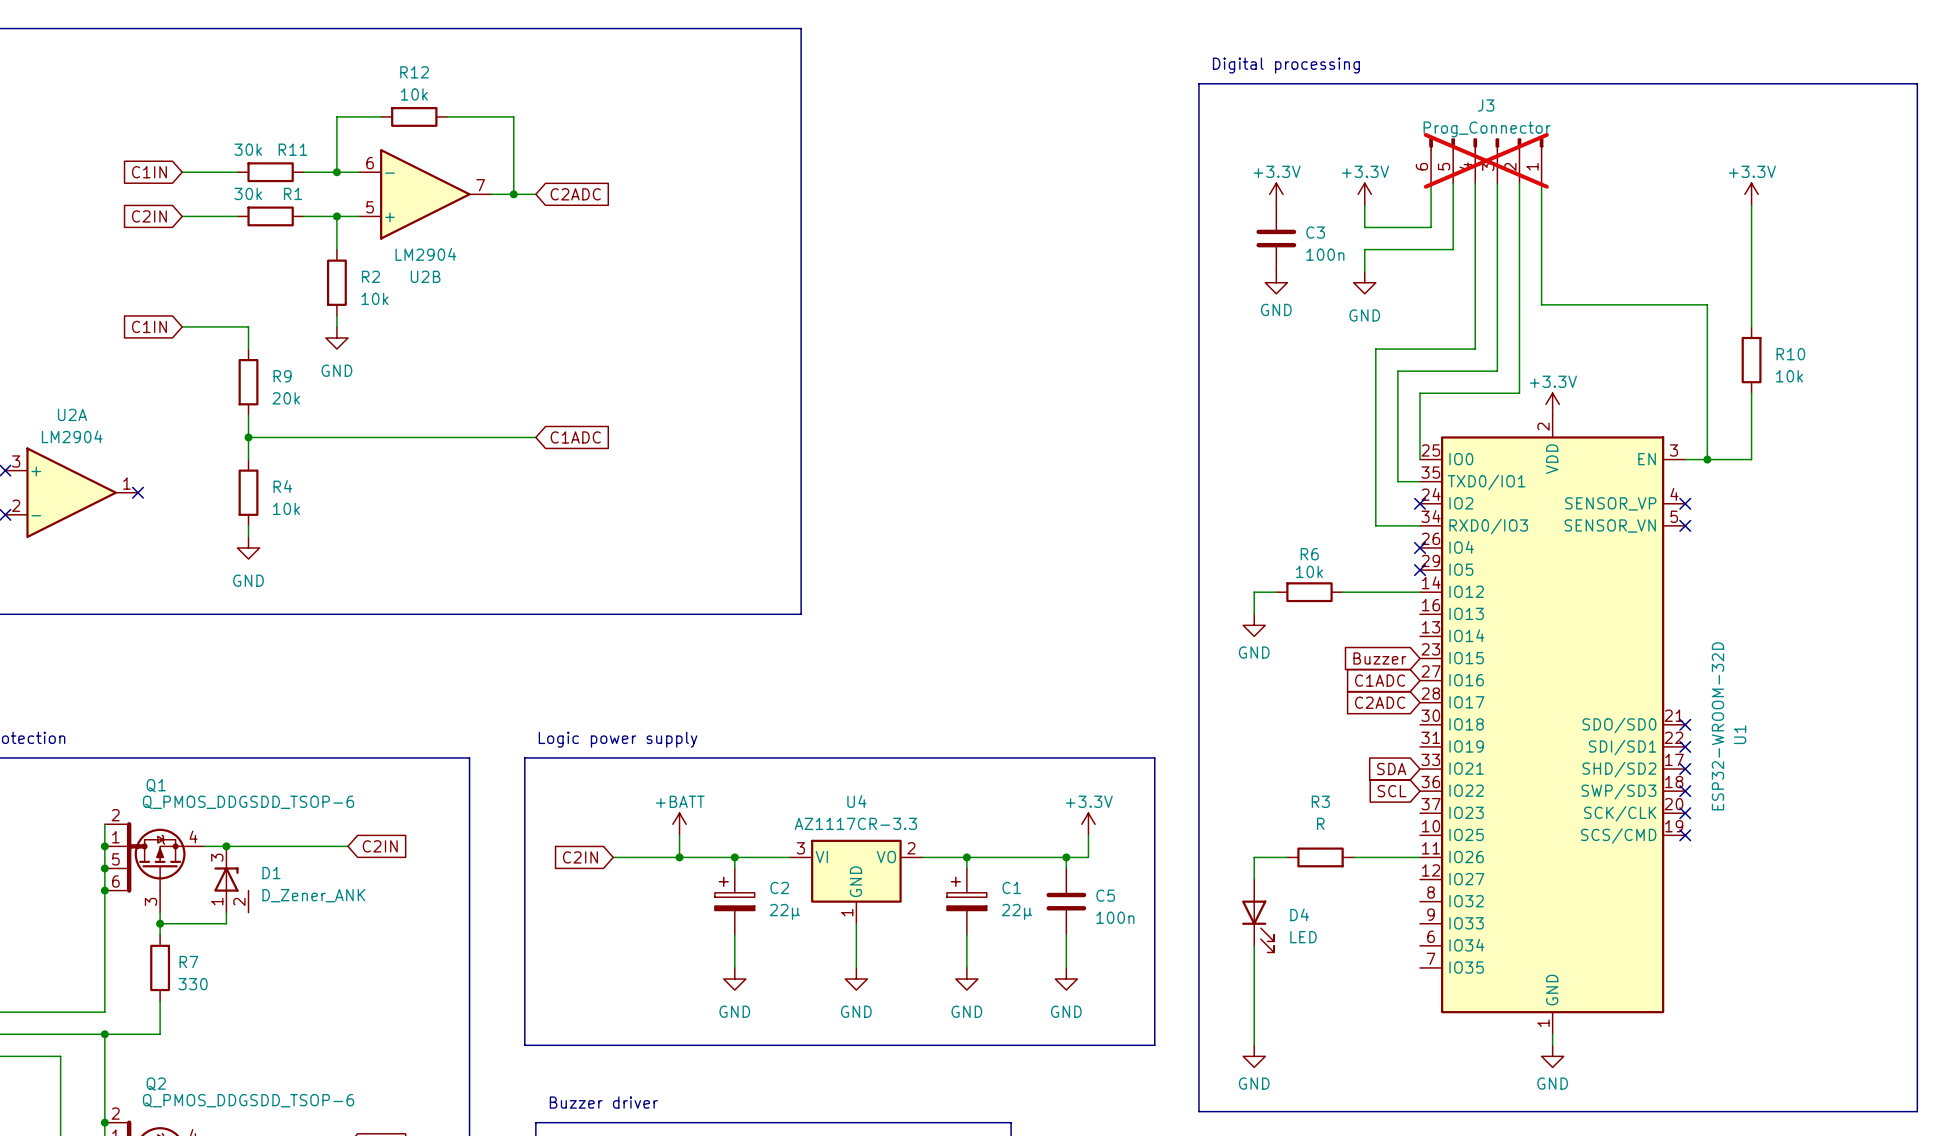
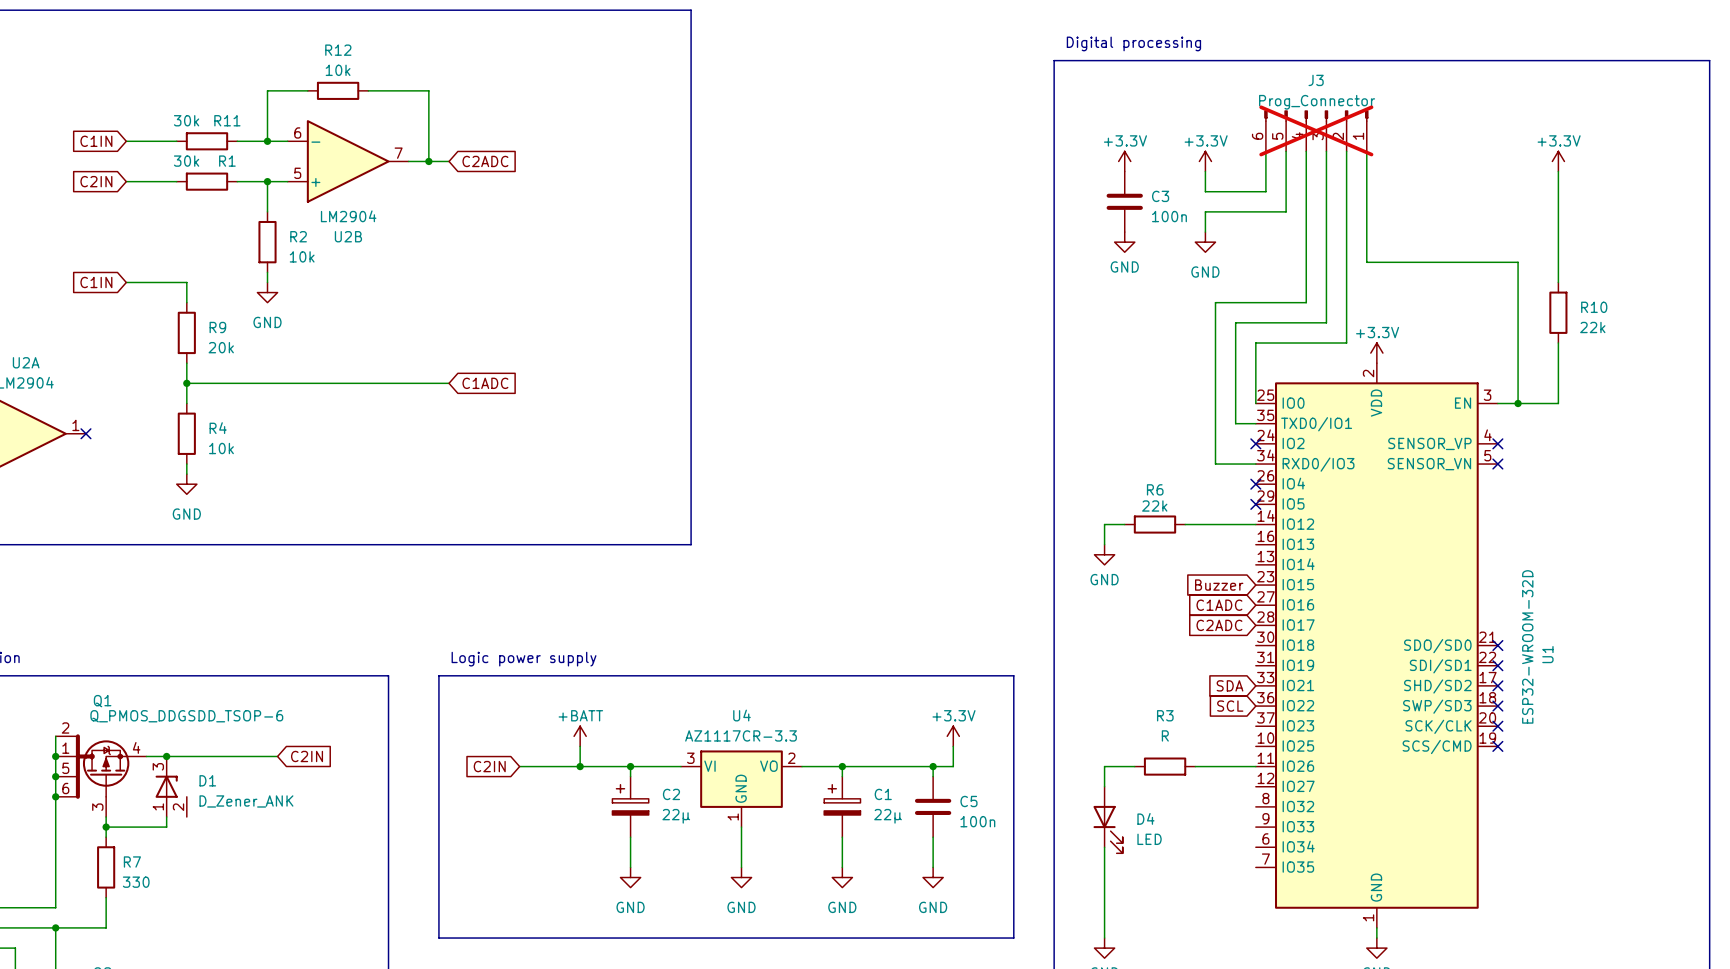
R10 value: 10k (1789, 376) -> 22k (1592, 327)
R6 value: 10k (1309, 571) -> 22k (1154, 506)

